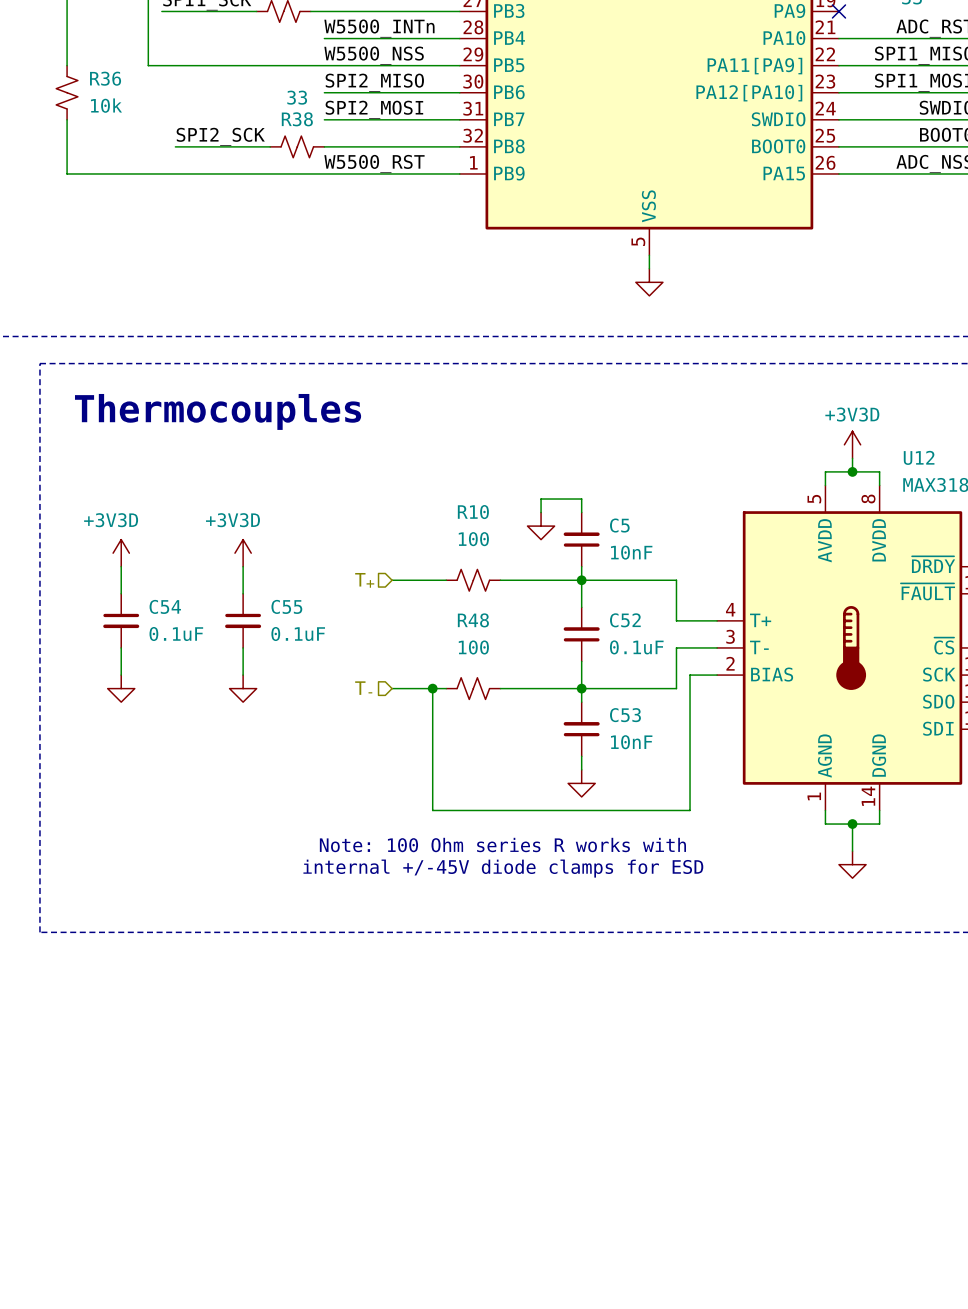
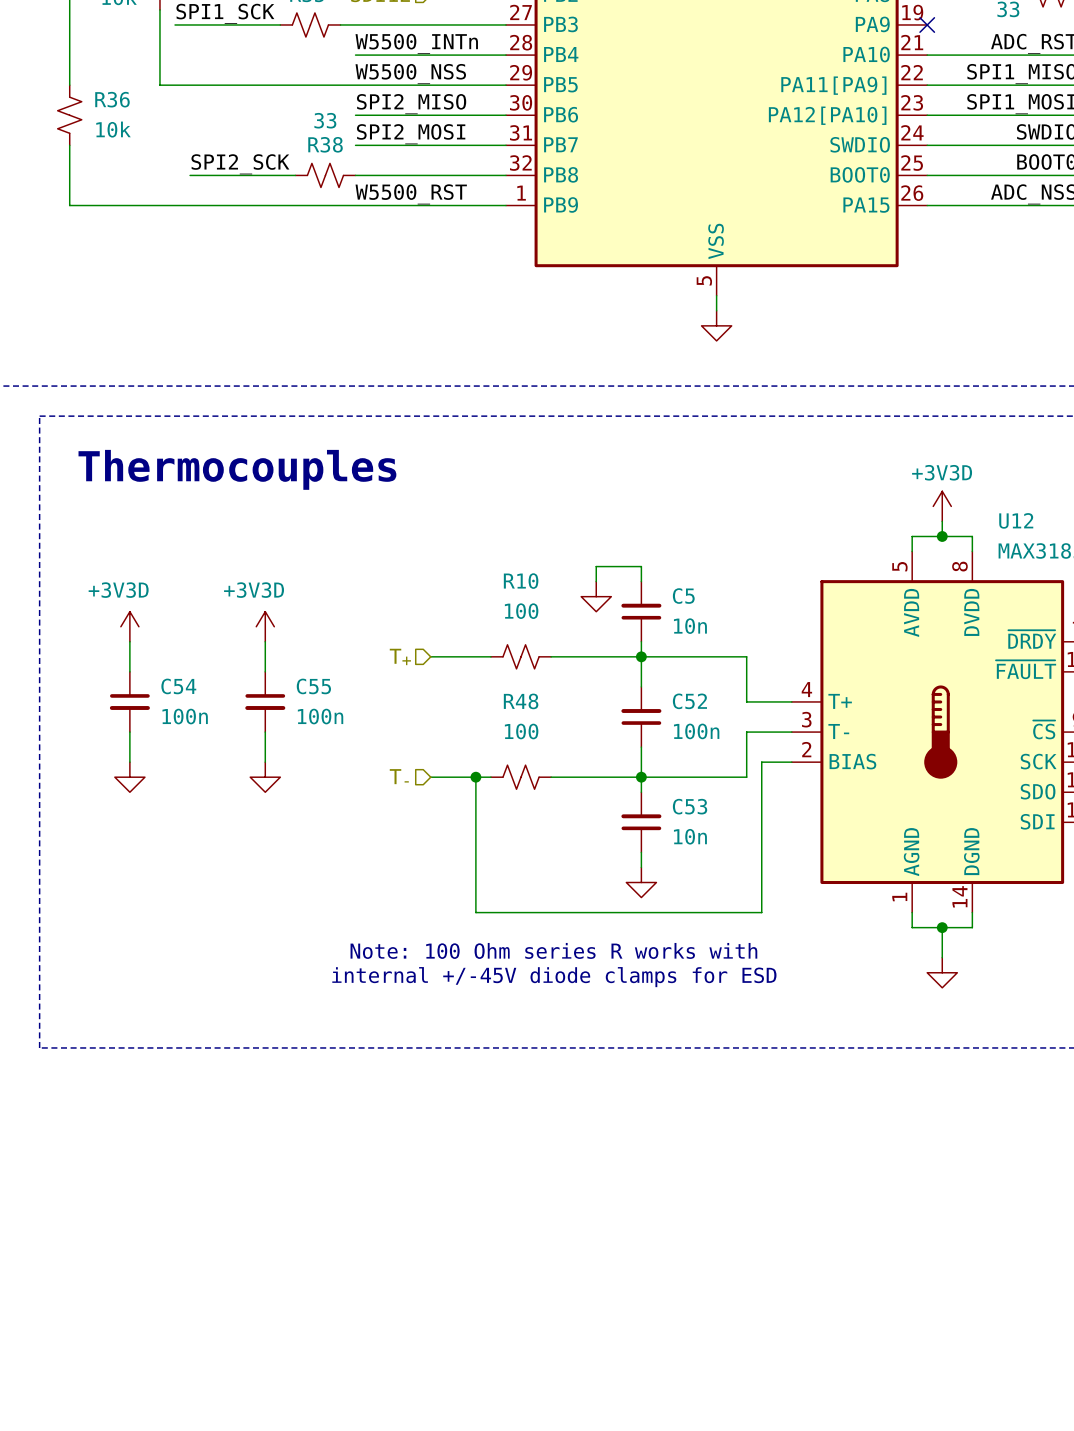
C5 value: 10nF (631, 552) -> 10n (690, 626)
C54 value: 0.1uF (176, 634) -> 100n (185, 716)
C55 value: 0.1uF (298, 634) -> 100n (320, 716)
C52 value: 0.1uF (636, 647) -> 100n (696, 731)
C53 value: 10nF (631, 742) -> 10n (690, 836)

